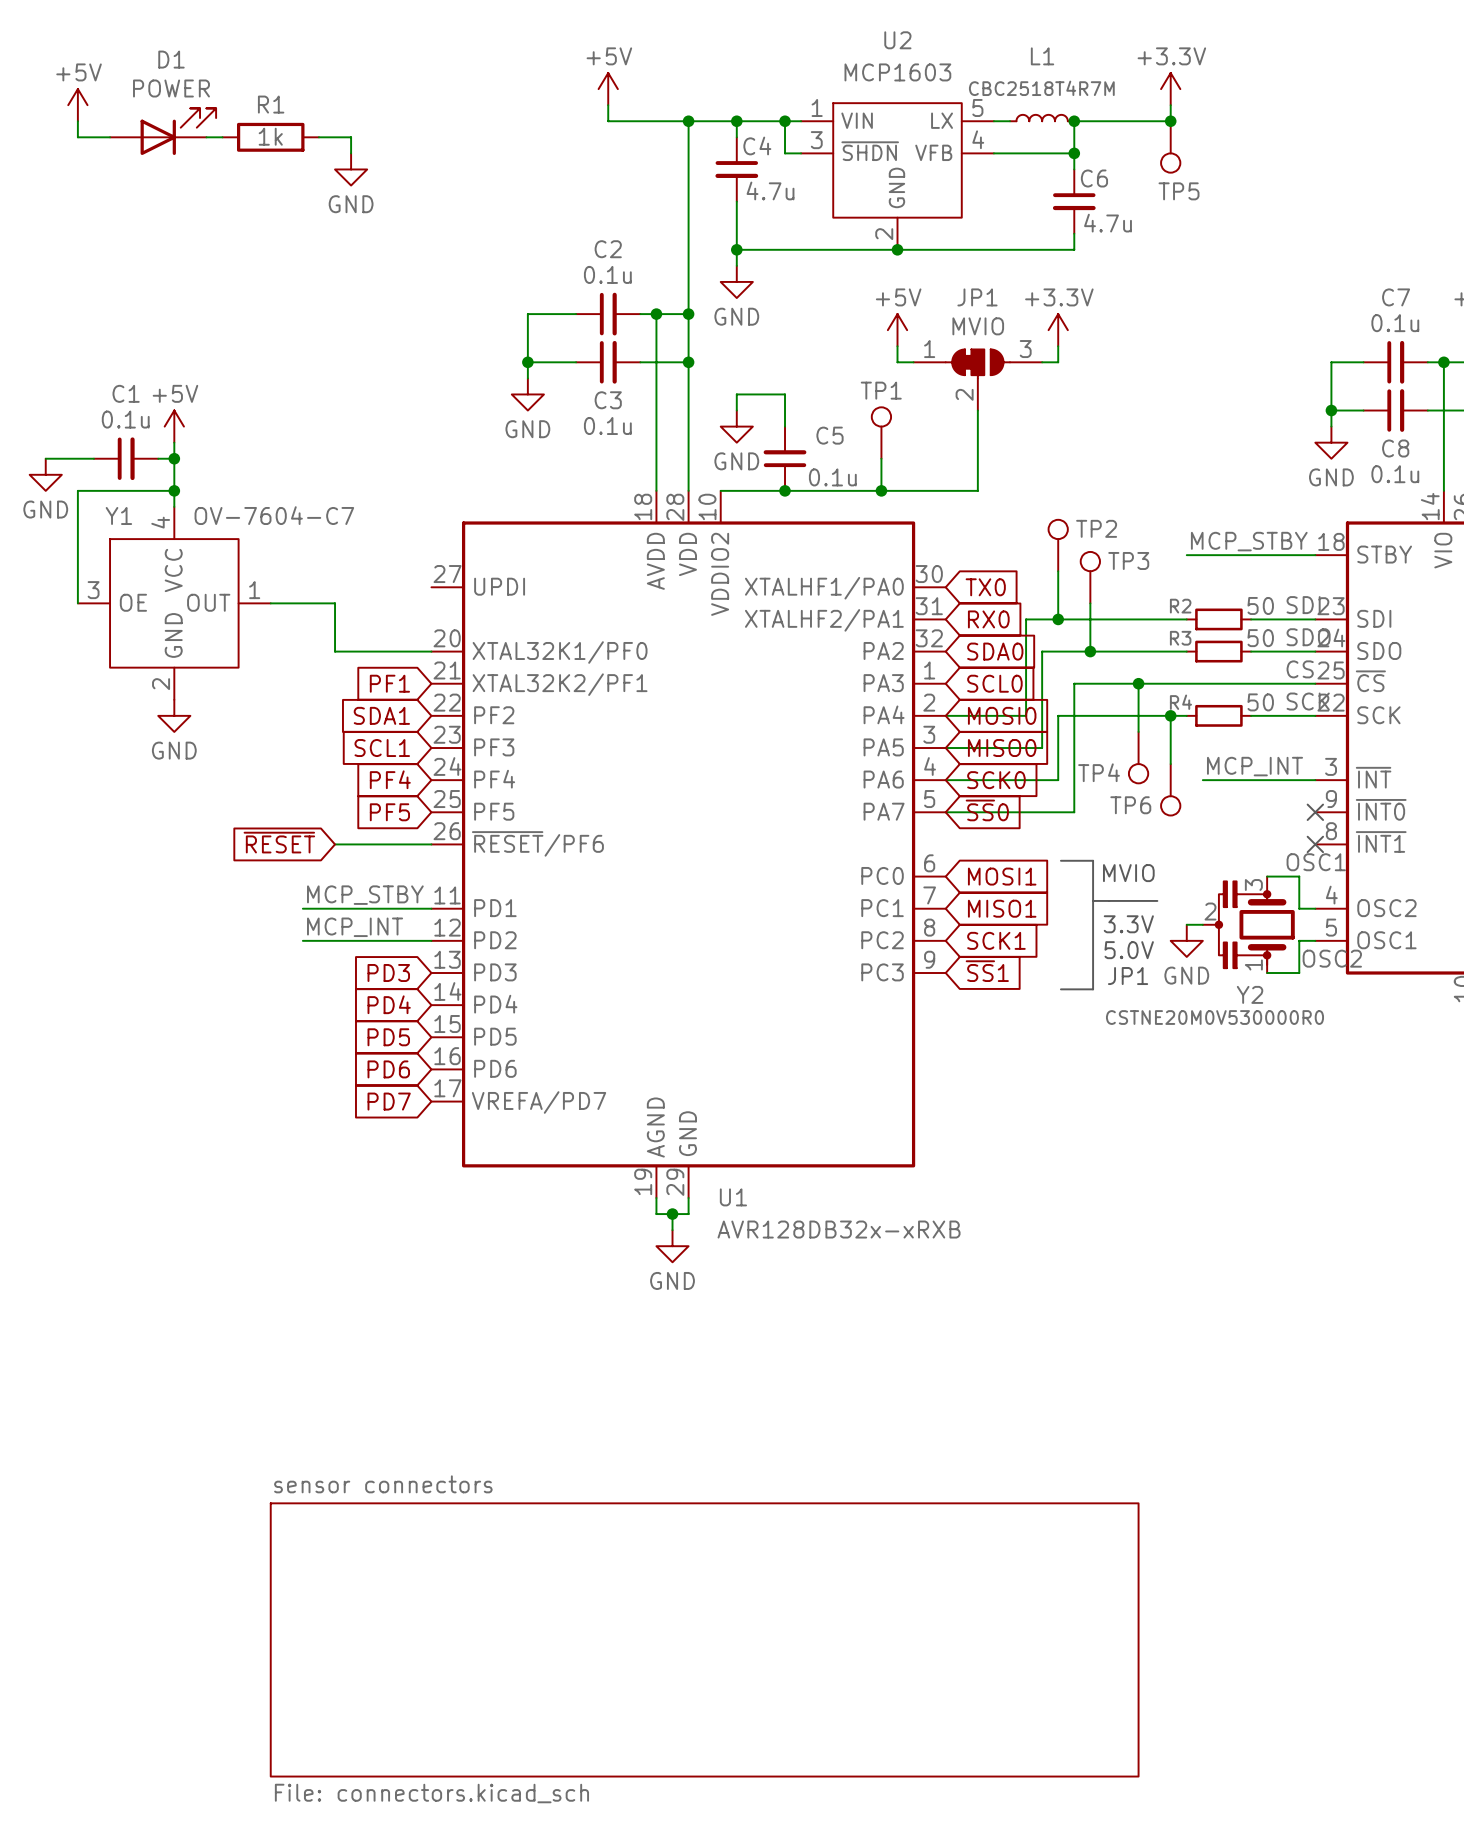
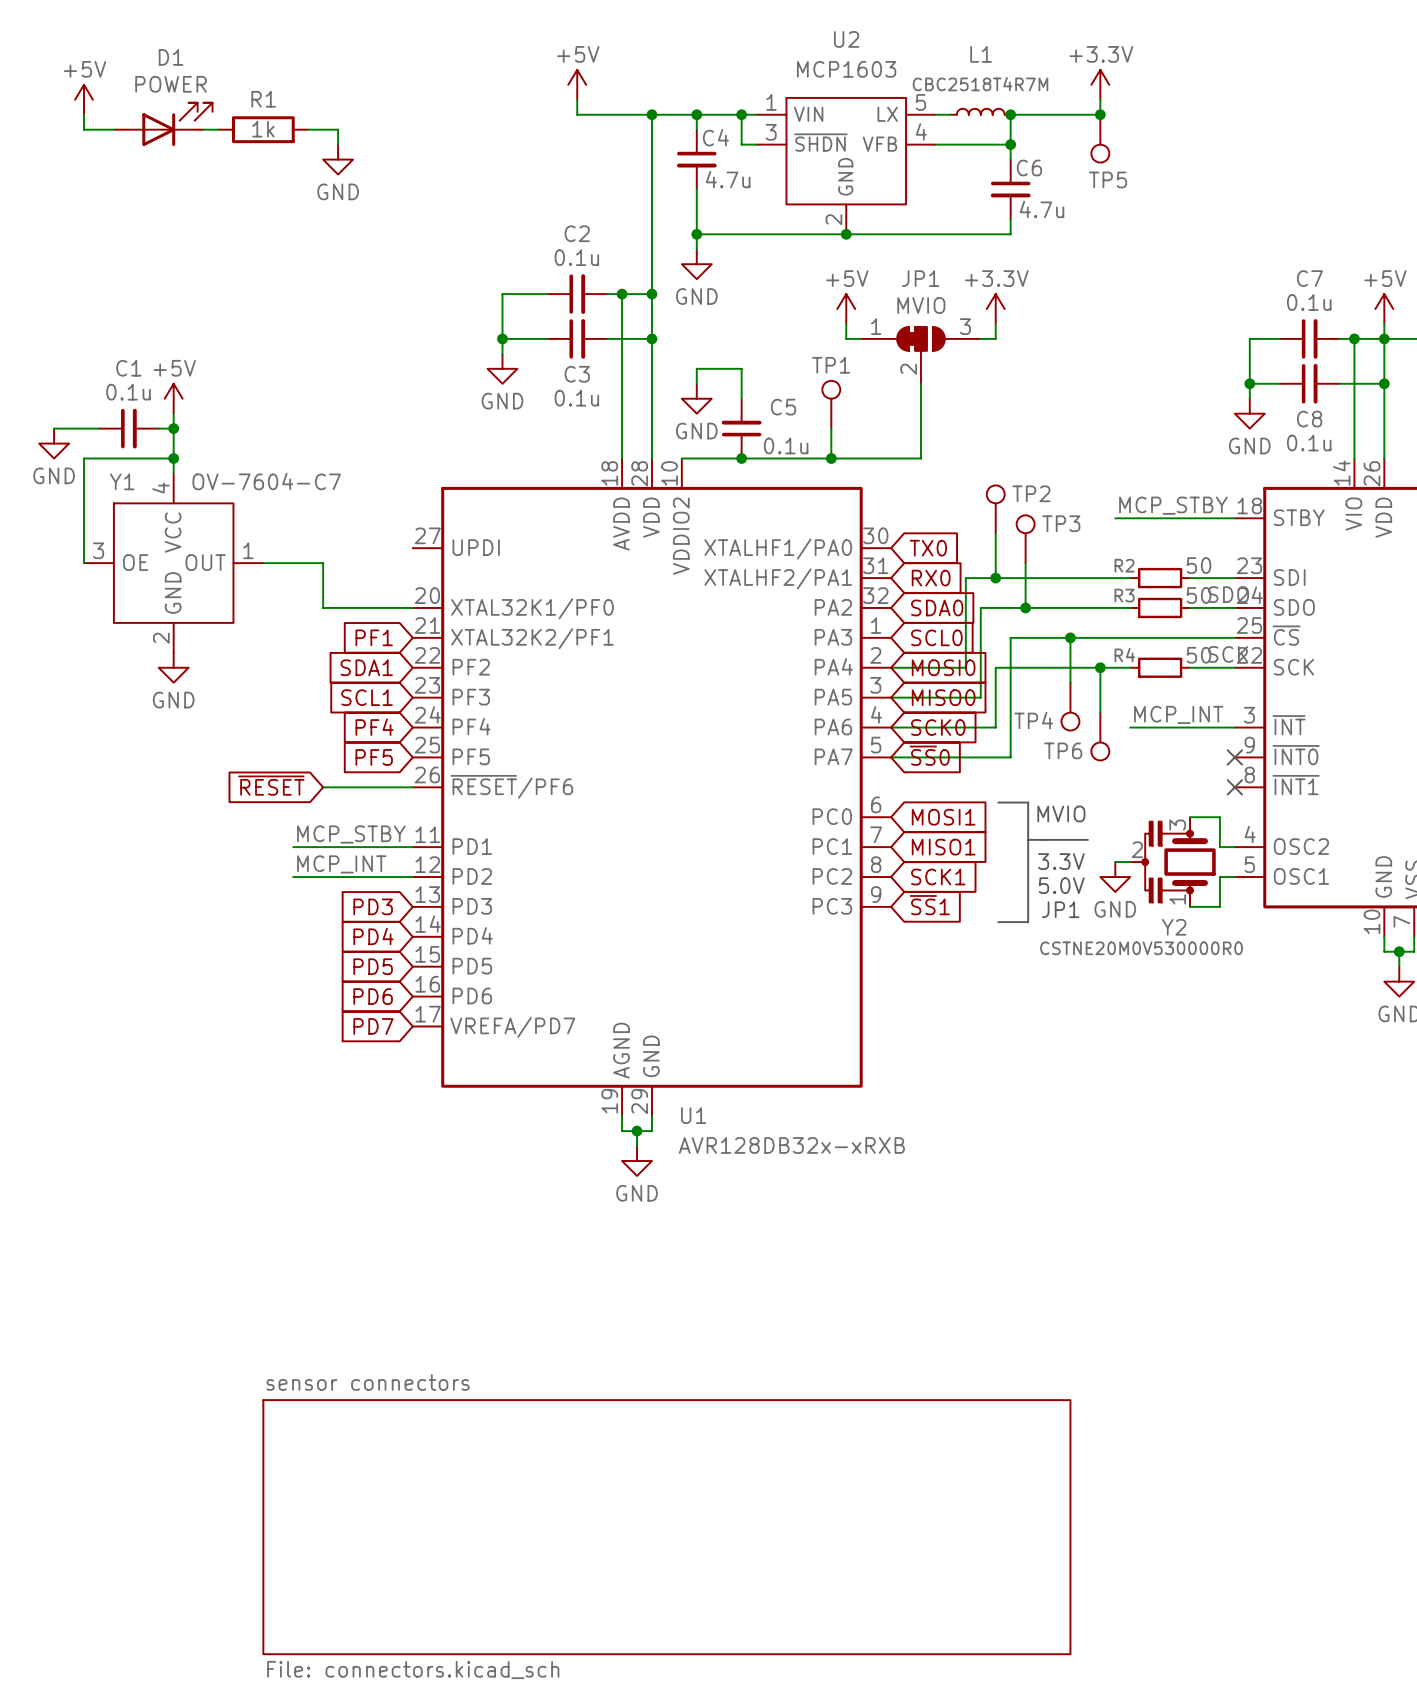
label: SDI (1303, 605) -> none
R2 position: (1218, 619) -> (1160, 578)
R3 position: (1218, 651) -> (1160, 607)
label: CS (1300, 669) -> none
R4 position: (1218, 715) -> (1160, 667)
label: OSC1 (1316, 862) -> none
label: OSC2 (1332, 958) -> none

